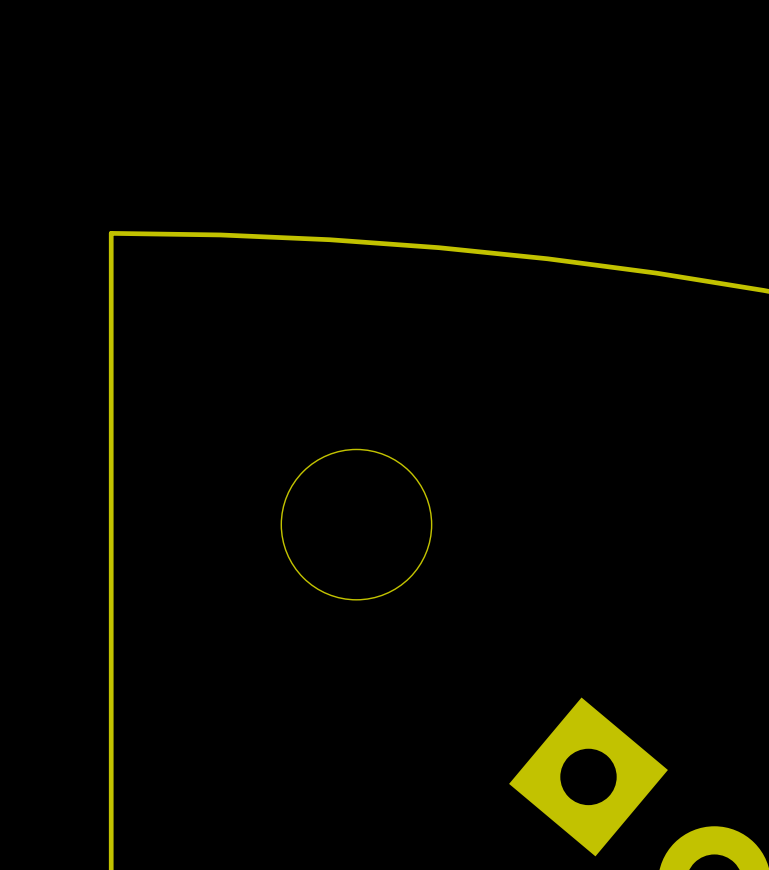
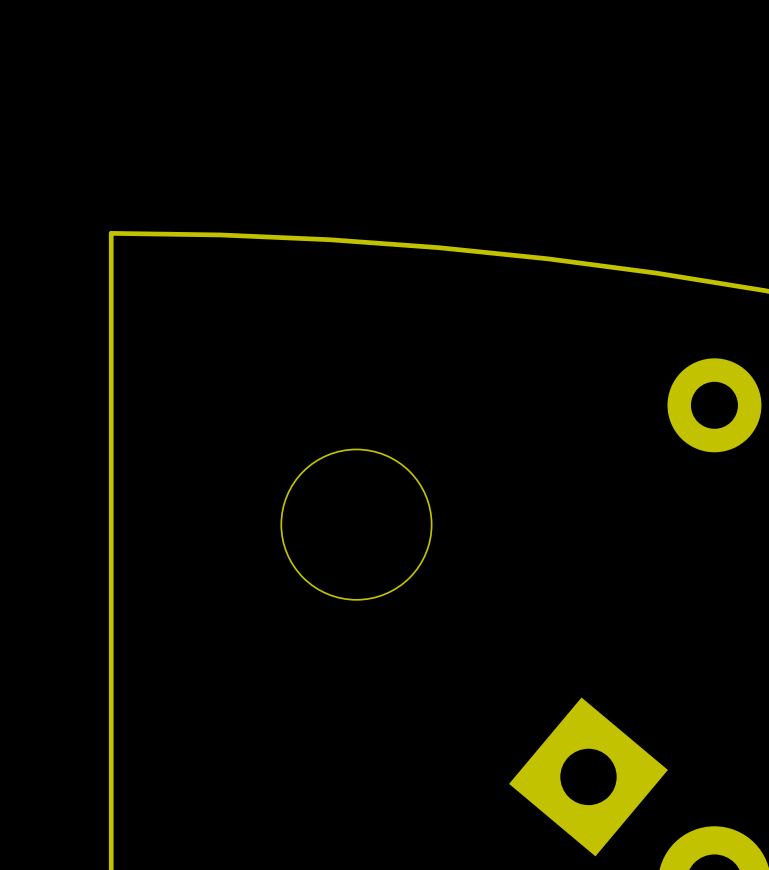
part: none -> (714, 405)

